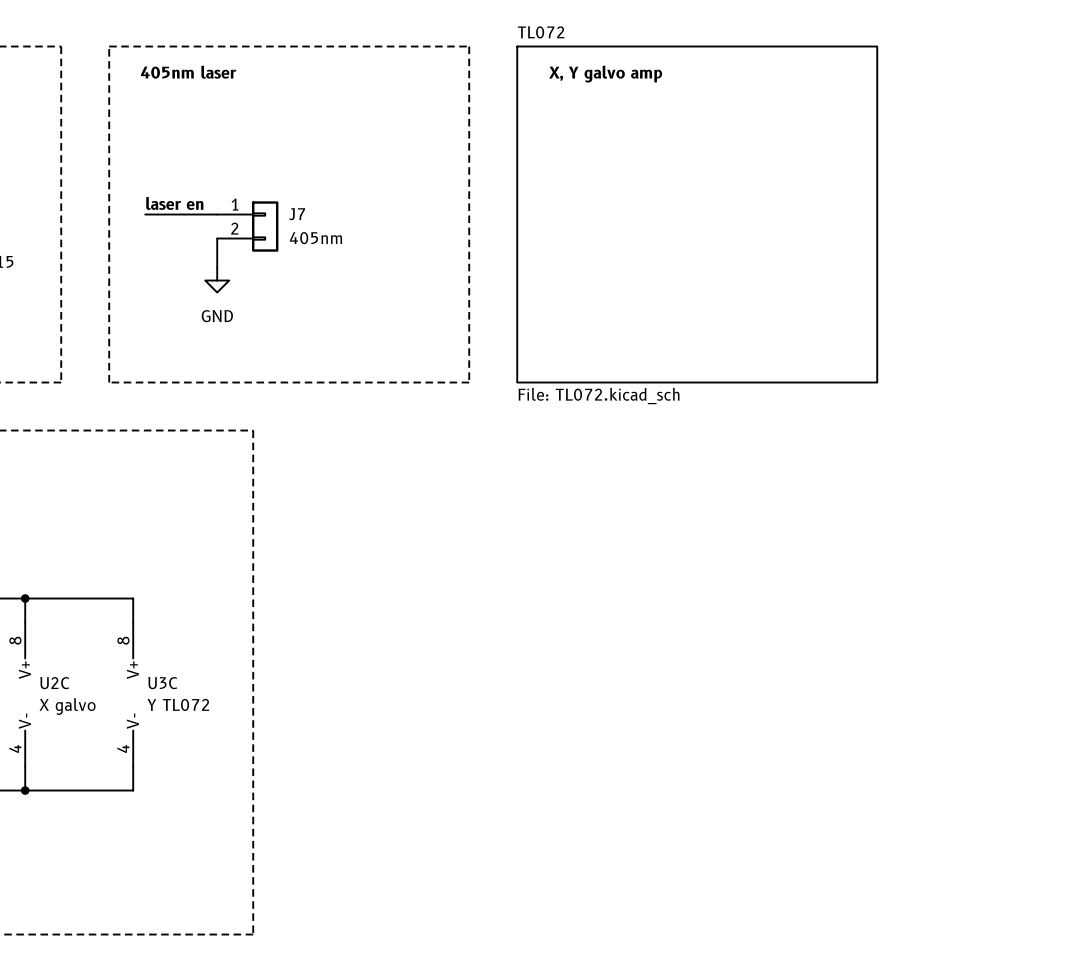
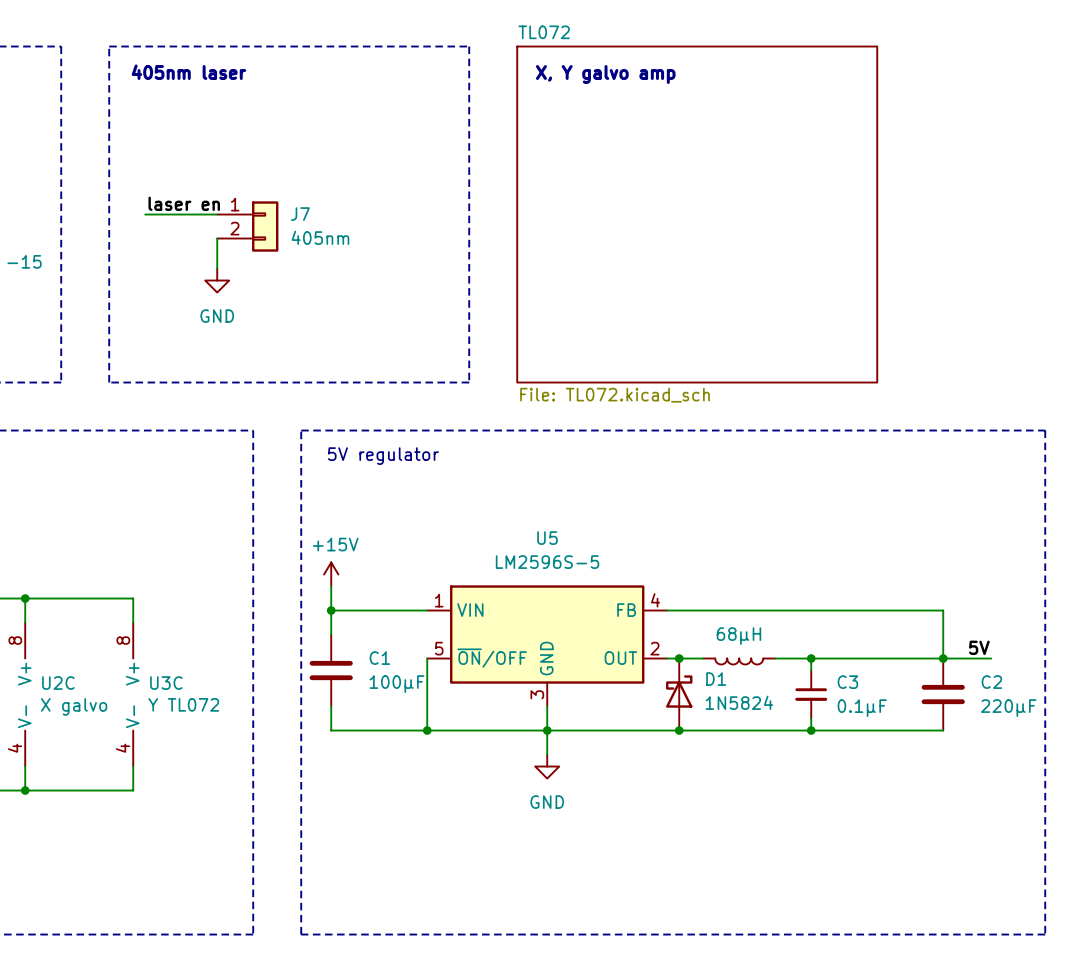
line: none -> (301, 430) (1045, 430) (1045, 934) (301, 934) (301, 430)
text: none -> 5V regulator (383, 456)
power symbol: none -> +15V (331, 574)
wire: none -> (331, 586) (331, 634)
wire: none -> (331, 610) (427, 610)
junction: none -> (331, 610)
wire: none -> (667, 610) (943, 610) (943, 658)
U5: none -> LM2596S-5 (547, 645)
label: none -> 5V (979, 647)
wire: none -> (427, 658) (427, 730)
wire: none -> (667, 658) (703, 658)
junction: none -> (679, 658)
wire: none -> (775, 658) (991, 658)
wire: none -> (811, 658) (811, 670)
junction: none -> (811, 658)
junction: none -> (943, 658)
part: none -> 68µH (739, 661)
C1: none -> 100µF (331, 670)
D1: none -> 1N5824 (679, 694)
C3: none -> 0.1µF (811, 694)
C2: none -> 220µF (943, 694)
wire: none -> (331, 706) (331, 730) (943, 730)
wire: none -> (547, 706) (547, 754)
wire: none -> (811, 718) (811, 730)
junction: none -> (427, 730)
junction: none -> (547, 730)
junction: none -> (679, 730)
junction: none -> (811, 730)
power symbol: none -> GND (547, 766)

